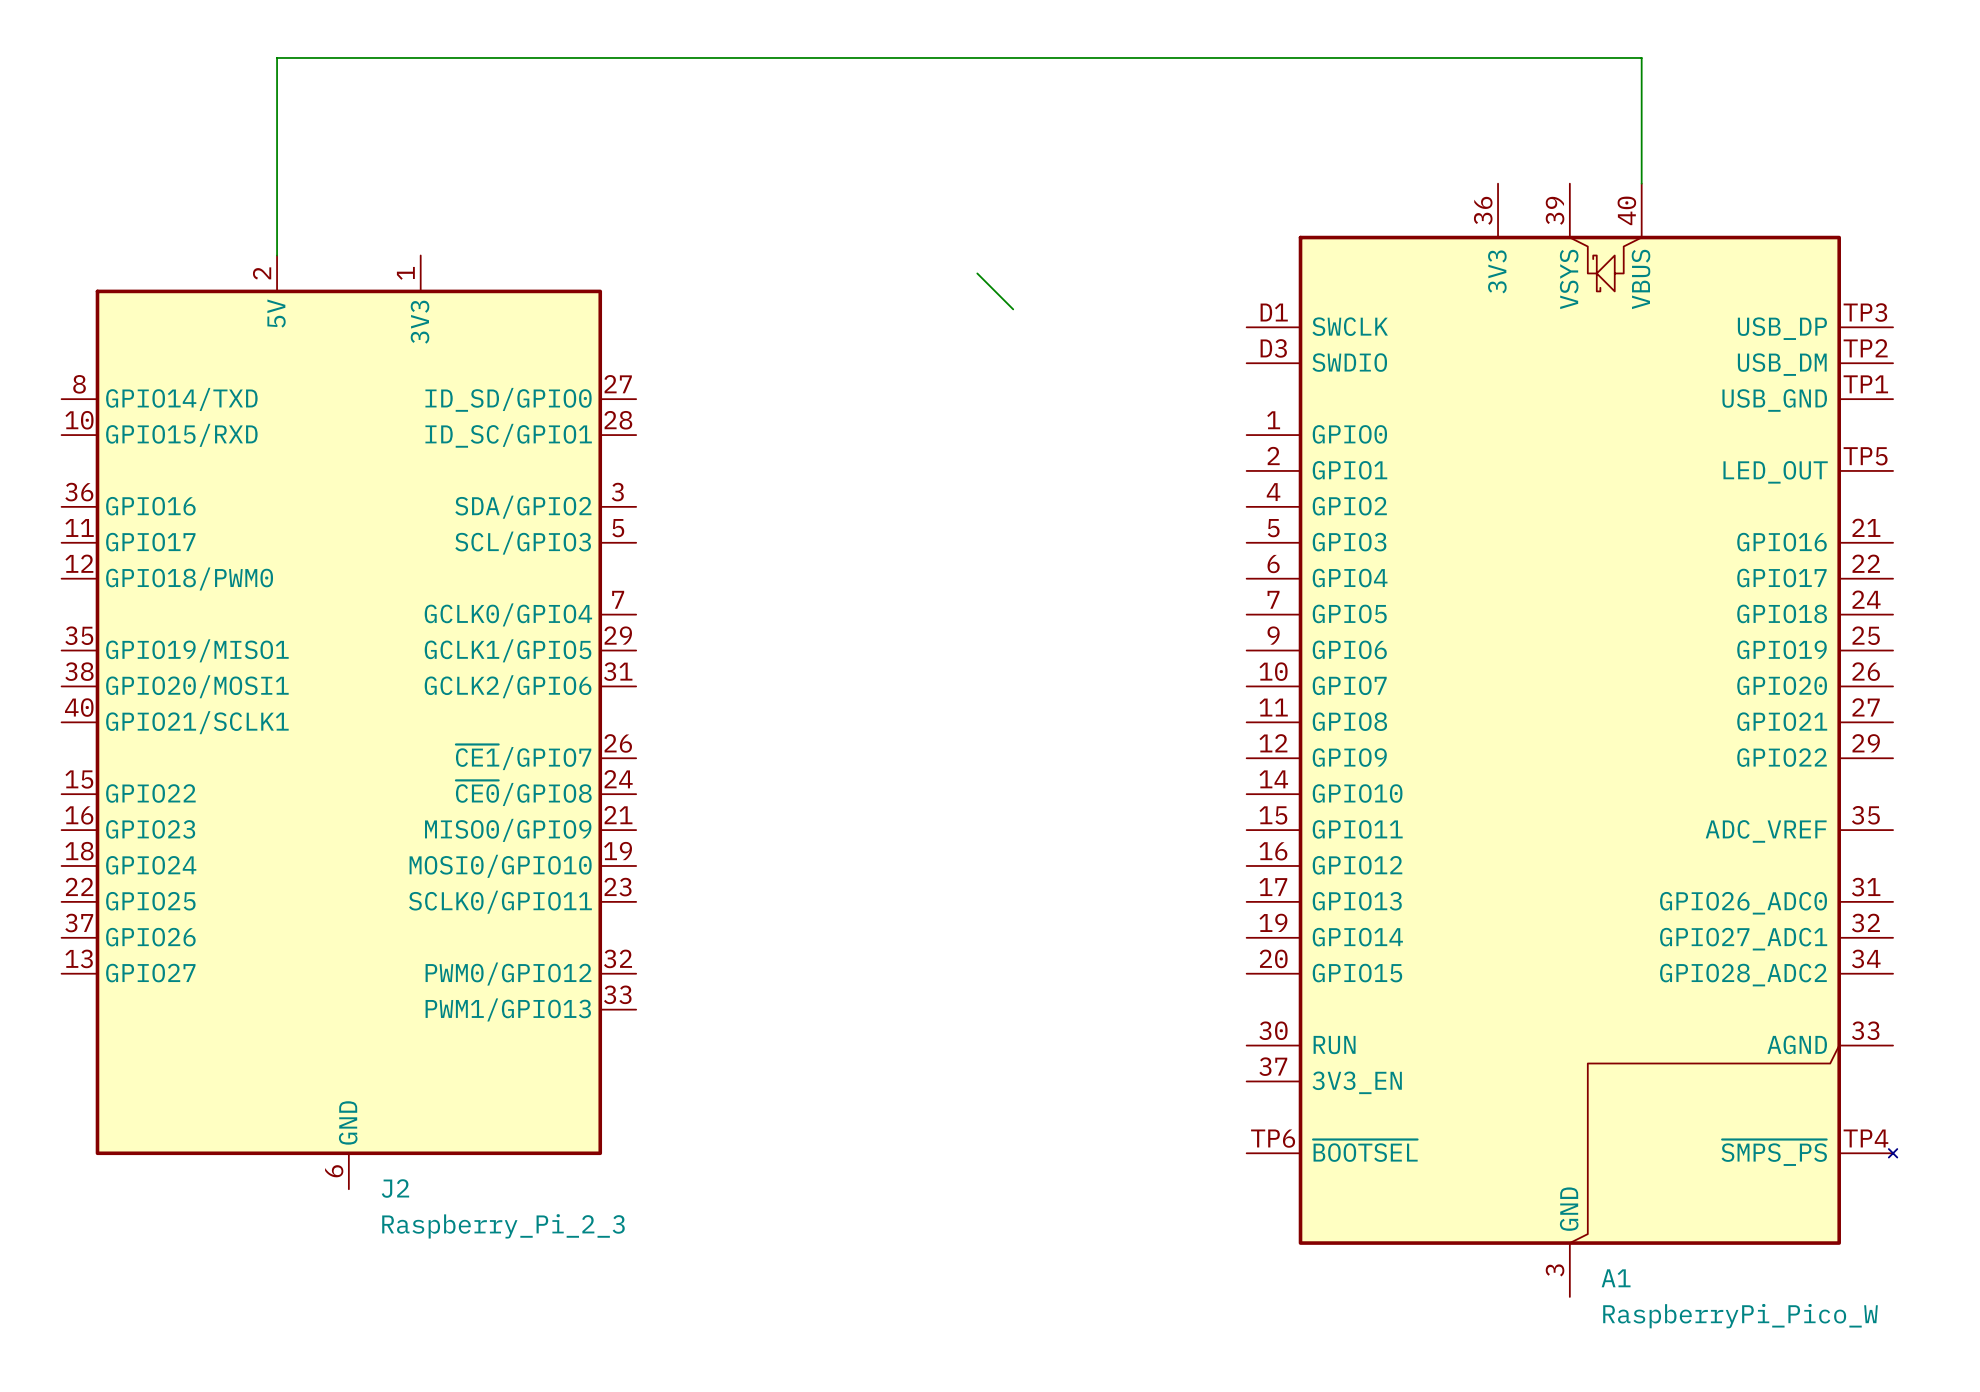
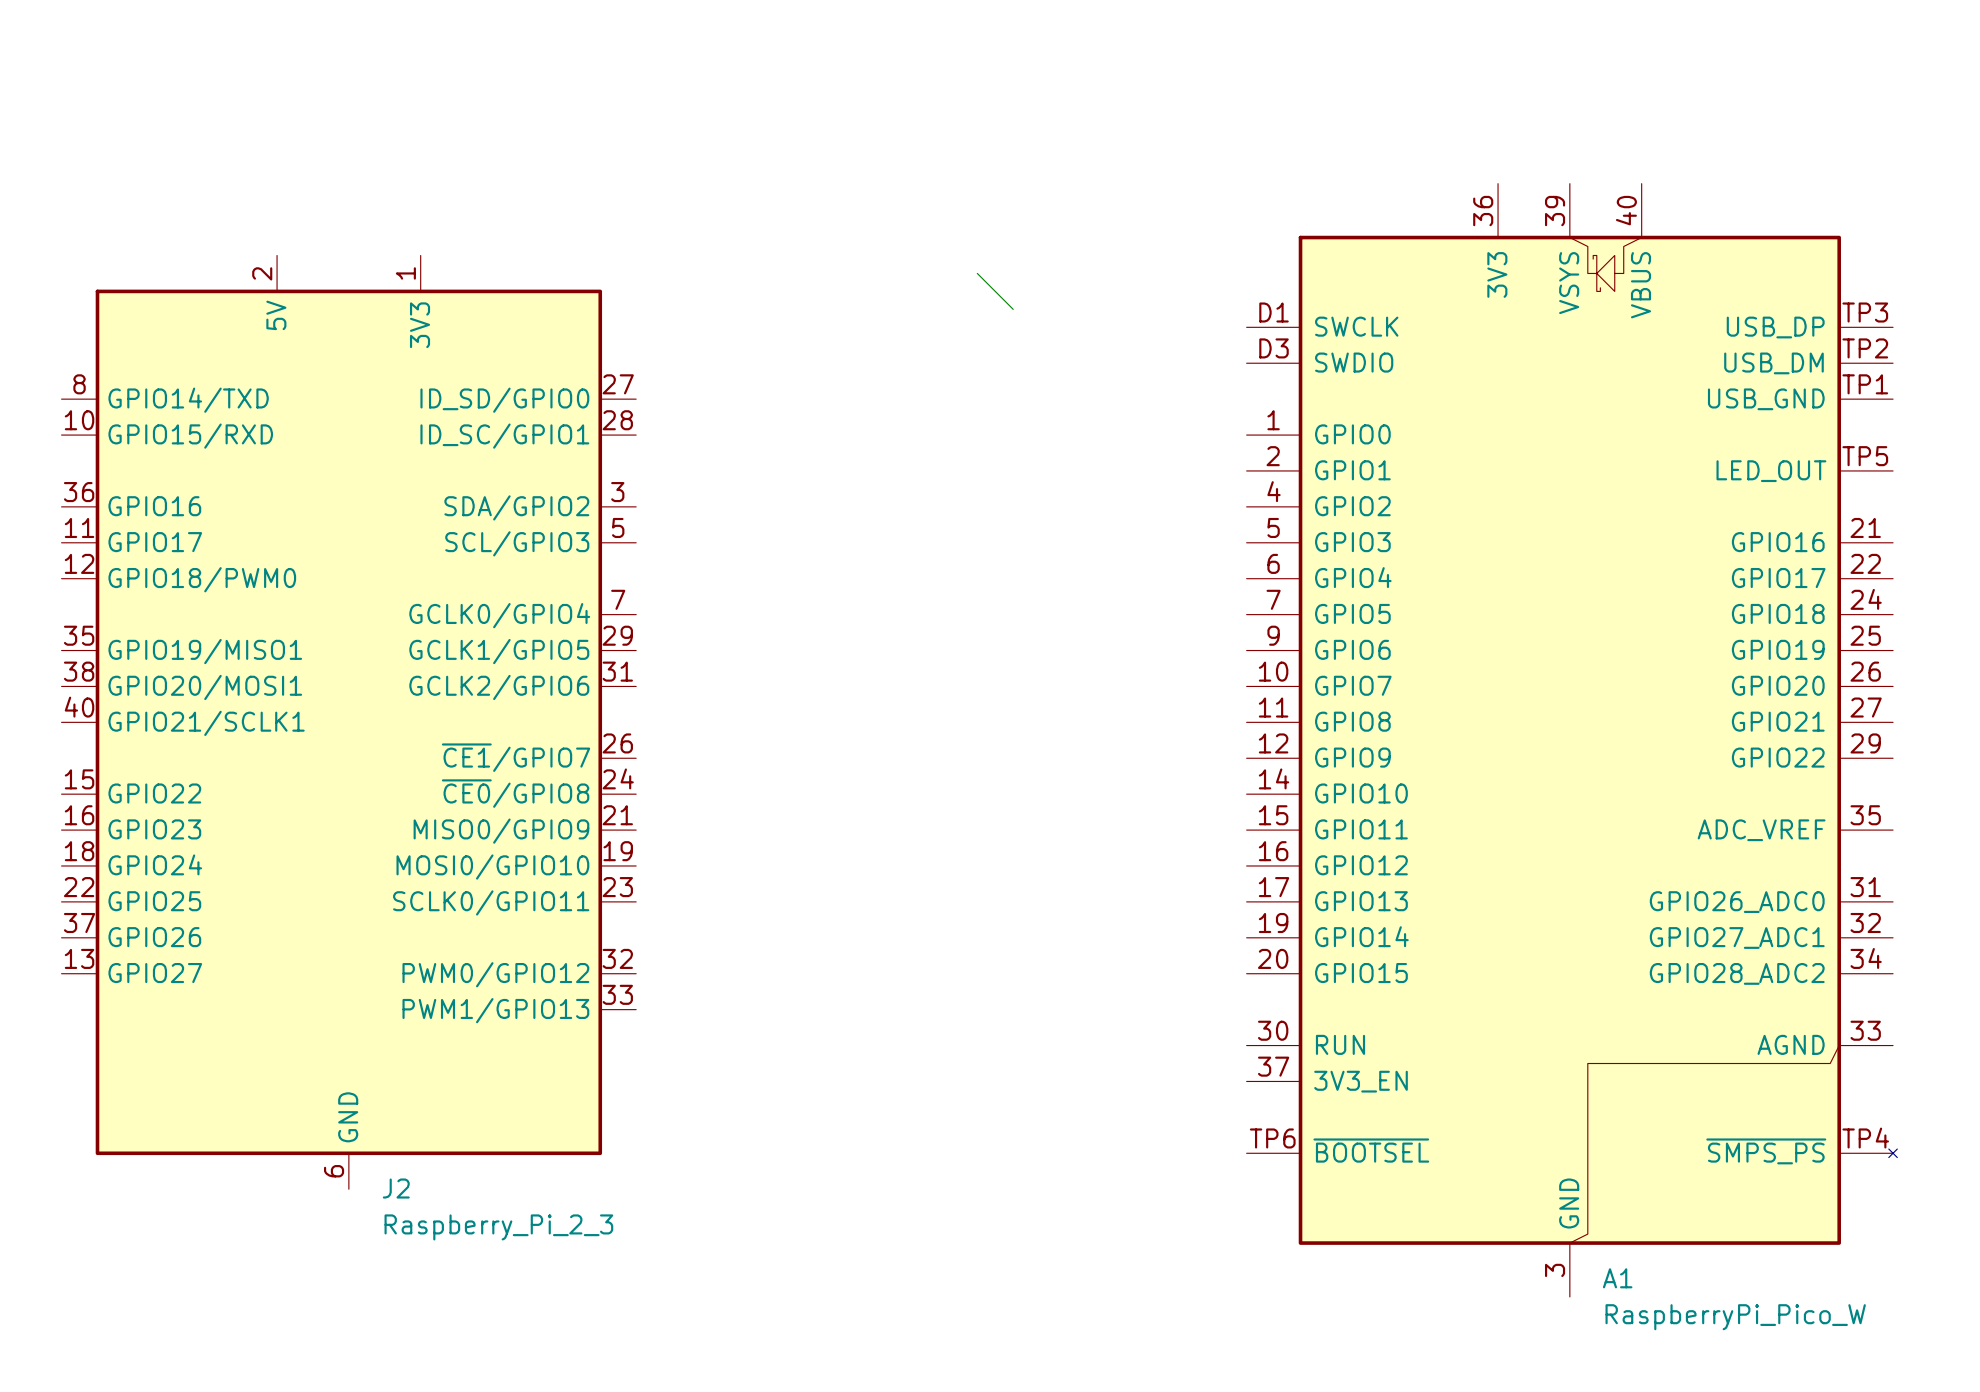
wire: (1641, 183) (1641, 57) (277, 57) (277, 255) -> none

